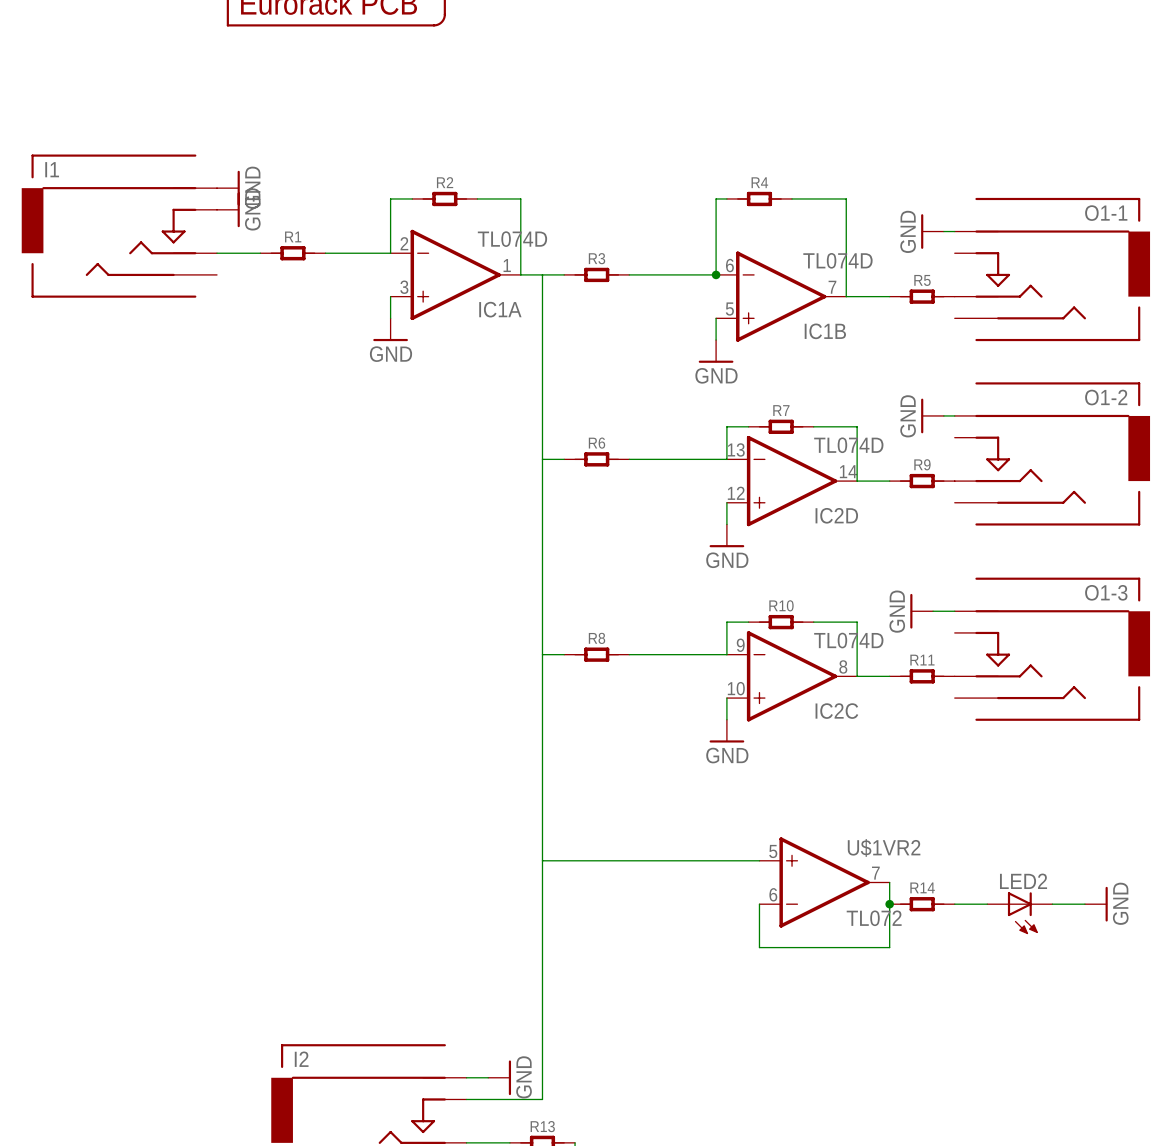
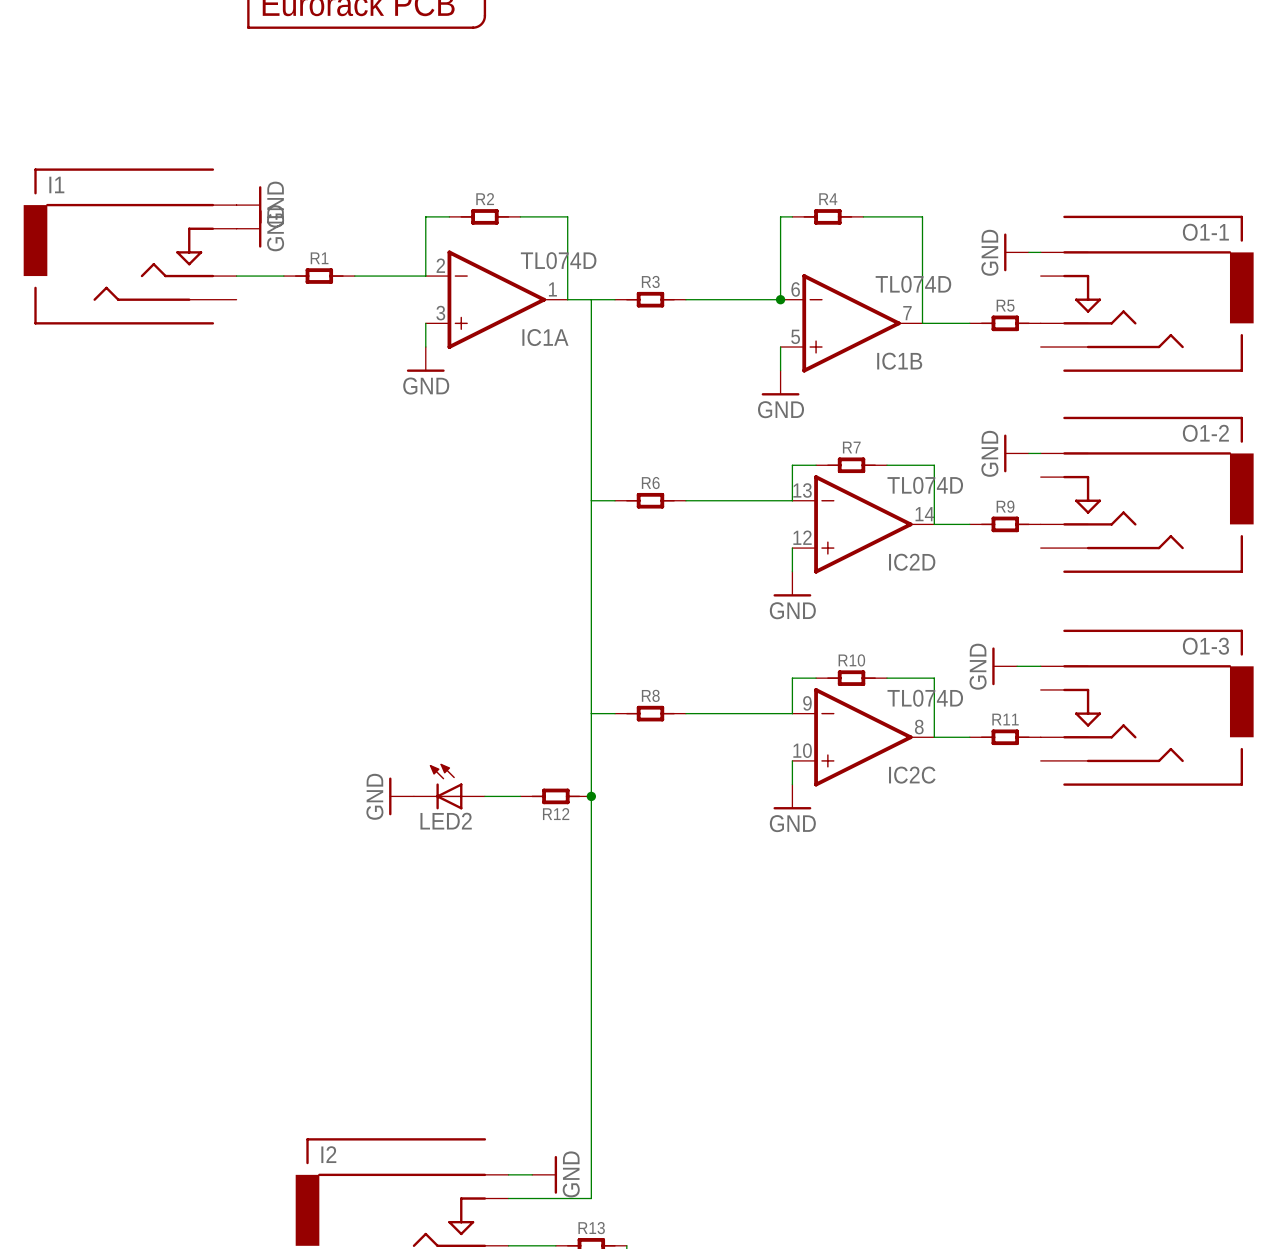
power symbol: none -> GND (401, 796)
wire: none -> (484, 796) (520, 796)
R12: none -> (555, 796)
junction: none -> (591, 796)
wire: (542, 860) (759, 860) -> none
U$1VR2: TL072 (824, 882) -> none
wire: (889, 882) (889, 947) (759, 947) (759, 904) -> none
junction: (889, 904) -> none
R14: (922, 904) -> none
wire: (954, 904) (987, 904) -> none
wire: (1052, 904) (1084, 904) -> none
power symbol: GND (1096, 904) -> none
LED2 position: (1019, 913) -> (449, 786)
LED2 rotation: 0° (1022, 913) -> 180° (446, 786)

